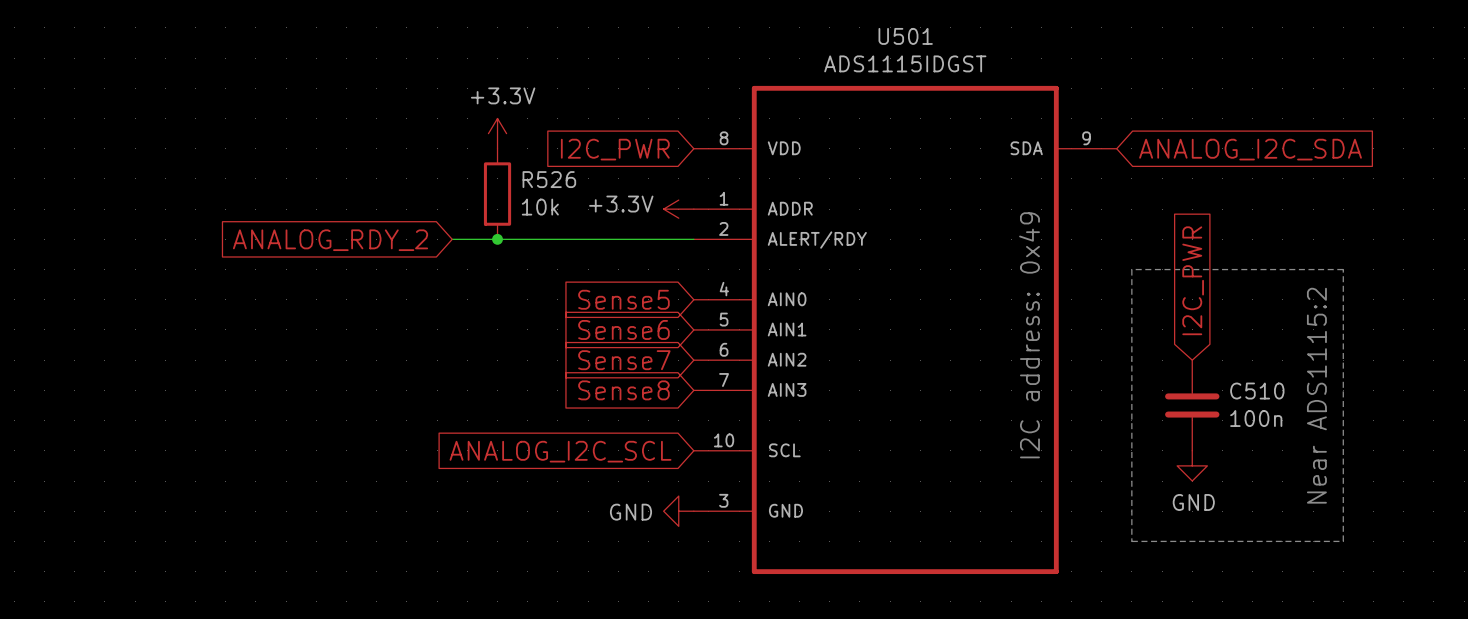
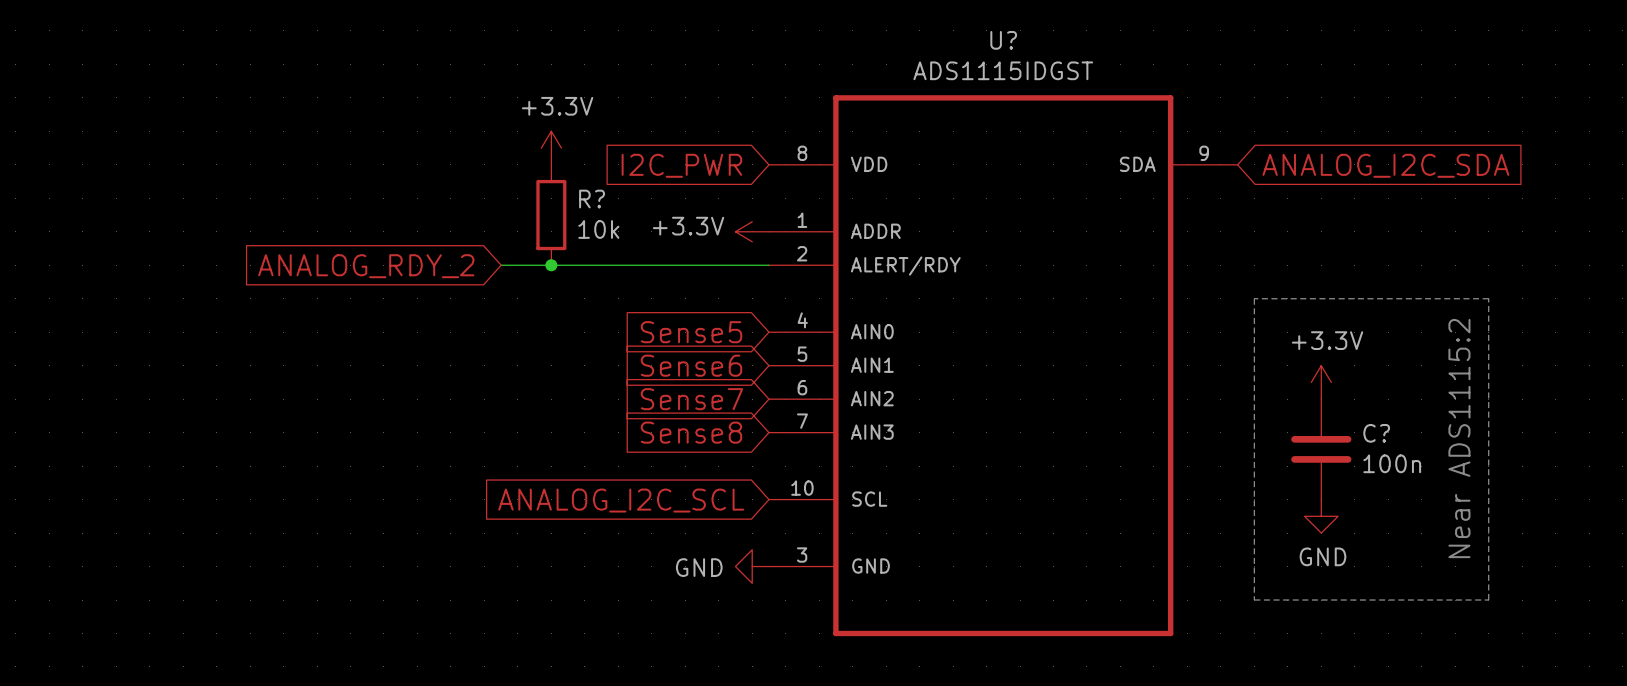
U501 name: U501 (905, 36) -> U? (1003, 40)
R526 name: R526 (549, 179) -> R? (592, 199)
global label: I2C_PWR (1193, 280) -> none
text: I2C address: 0x49 (1029, 335) -> none
power symbol: none -> +3.3V (1321, 382)
C510 name: C510 (1257, 391) -> C? (1376, 433)

